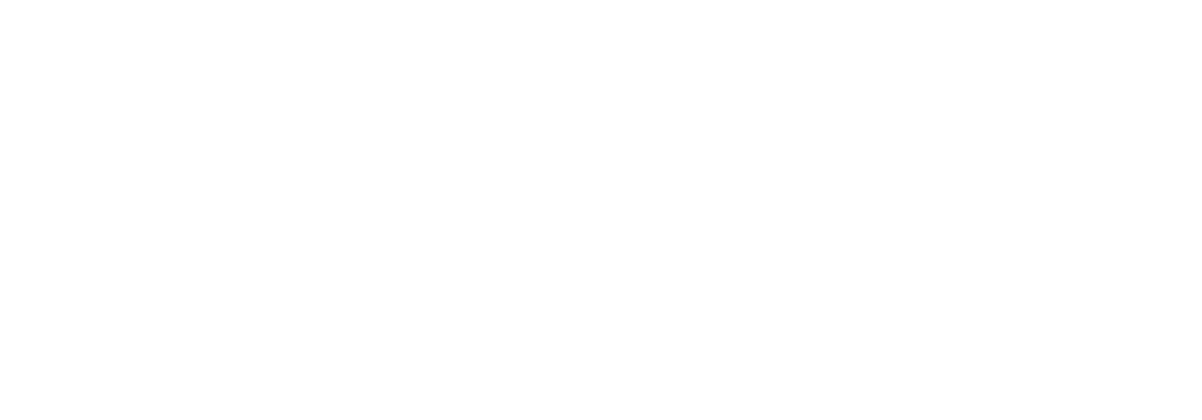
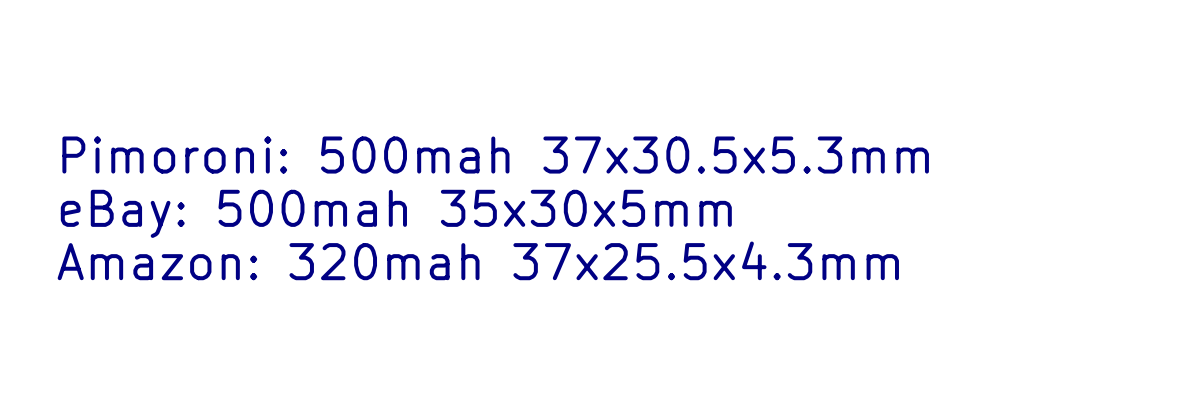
text: none -> Pimoroni: 500mah 37x30.5x5.3mm (495, 155)
text: none -> eBay: 500mah 35x30x5mm (396, 213)
text: none -> Amazon: 320mah 37x25.5x4.3mm (478, 260)

